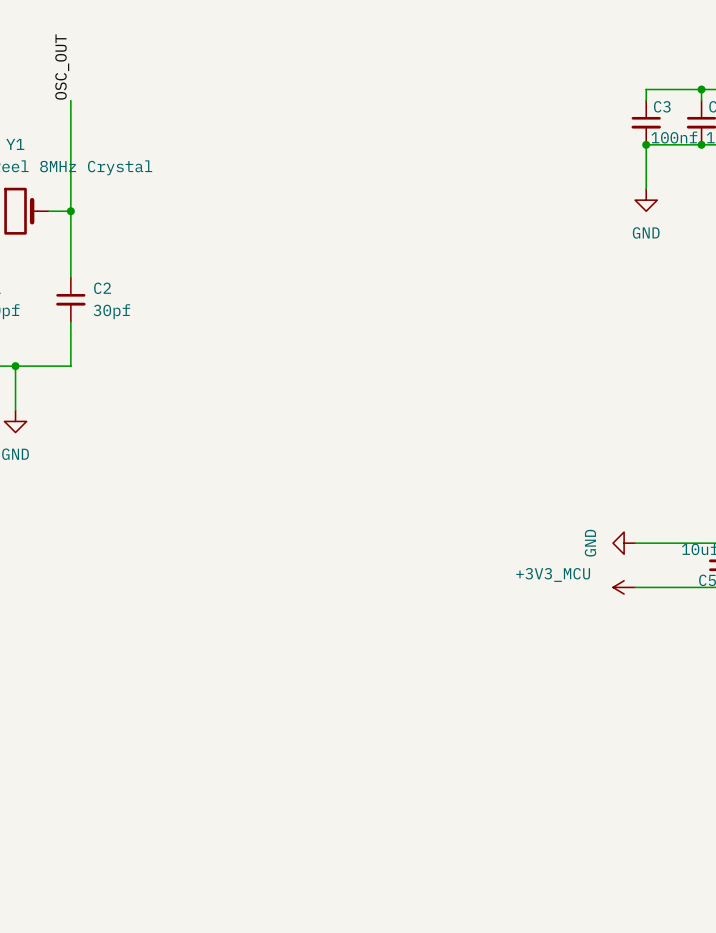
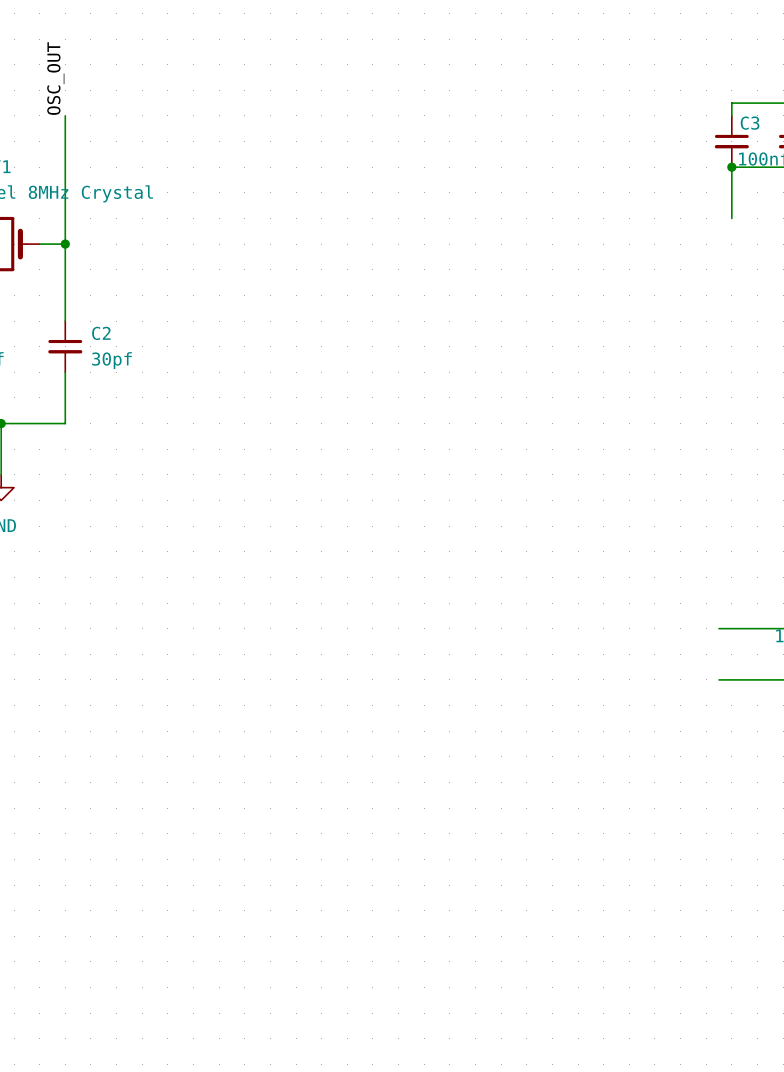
power symbol: GND (646, 200) -> none
power symbol: GND (624, 543) -> none
power symbol: +3V3_MCU (624, 587) -> none

